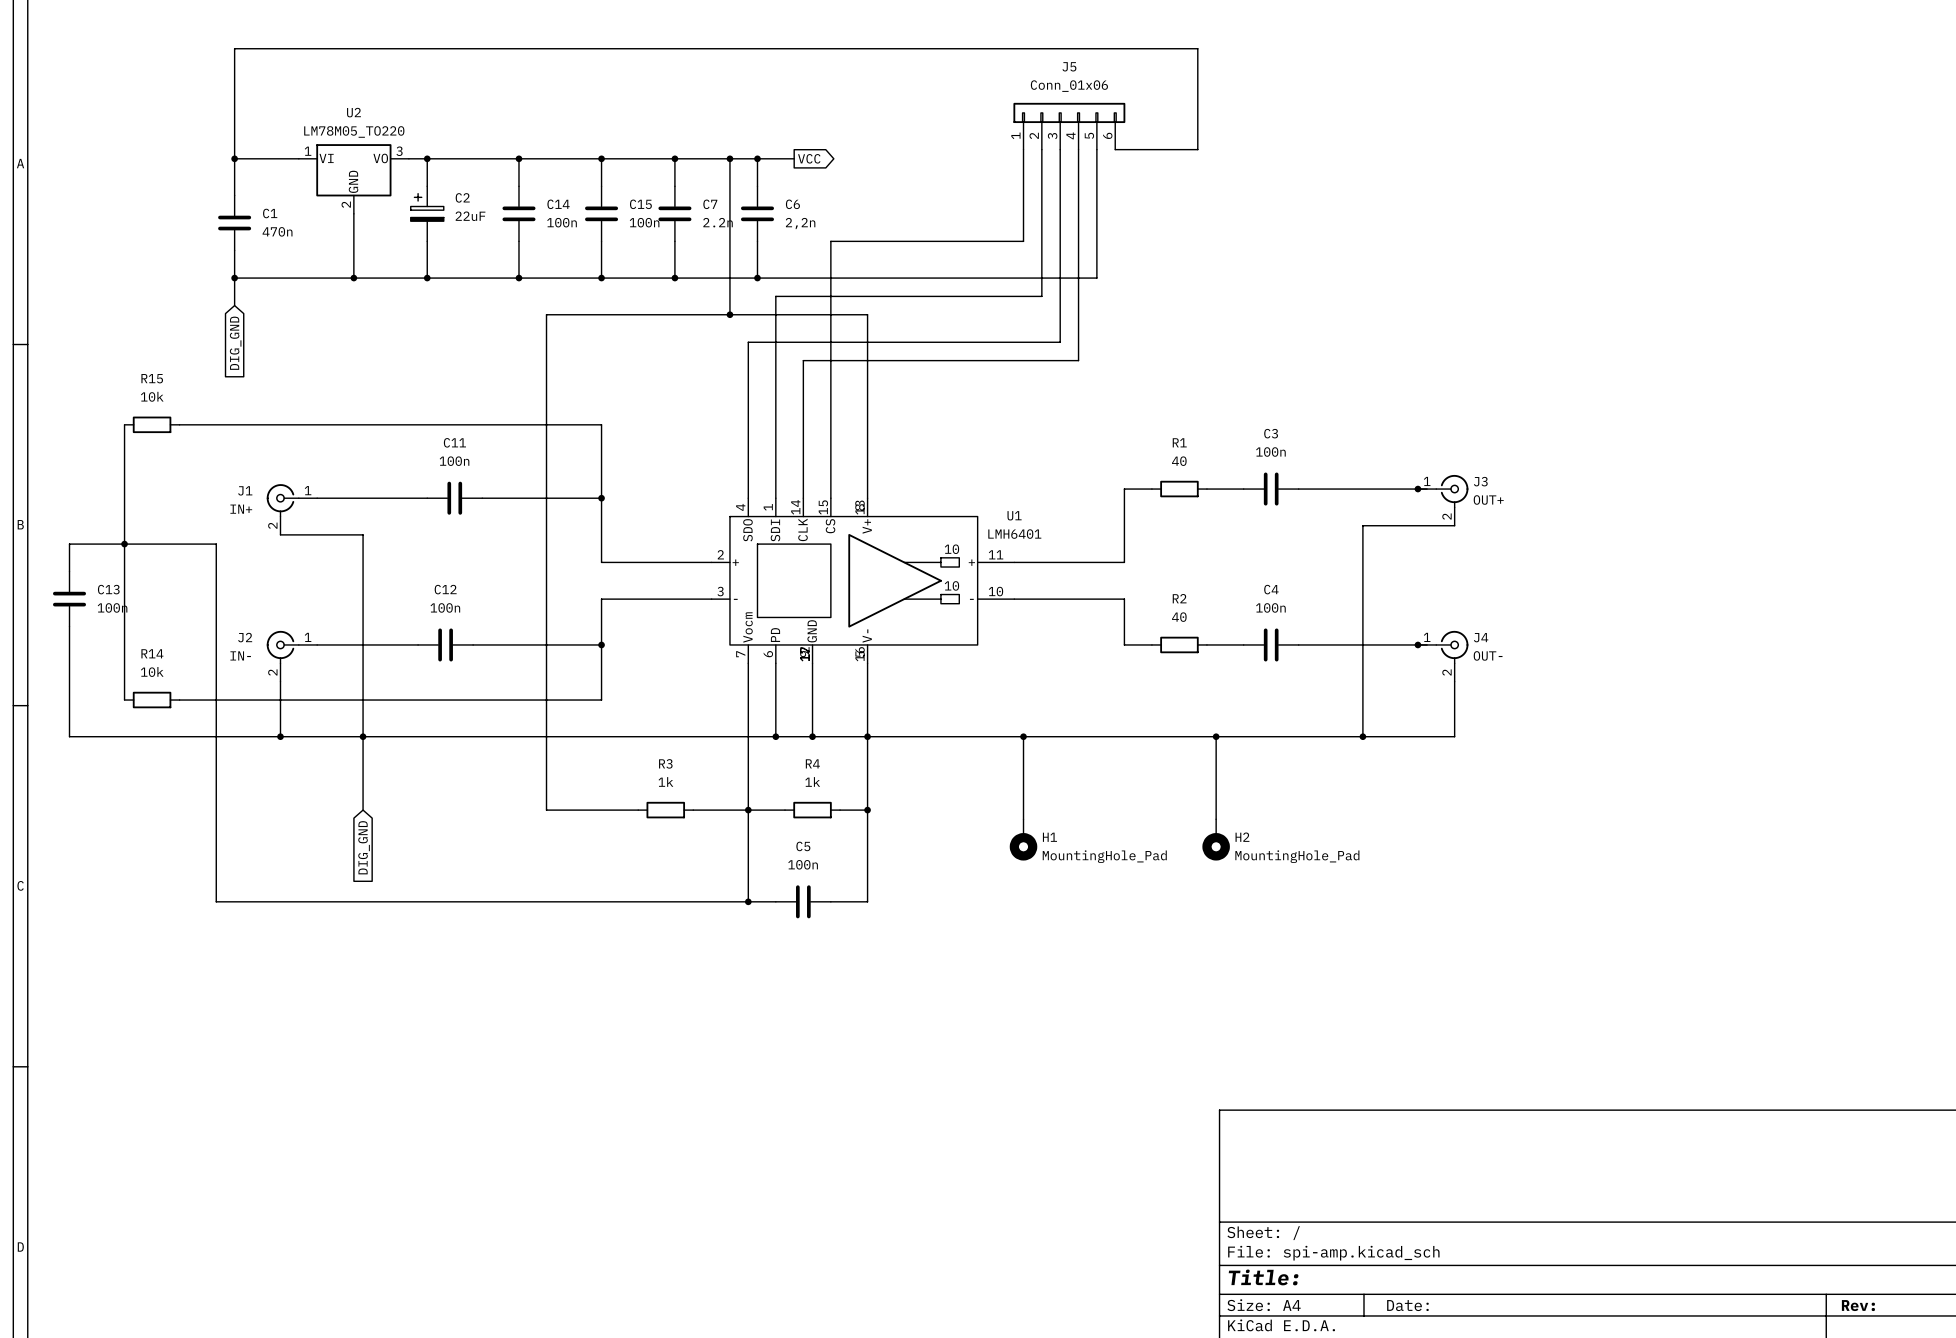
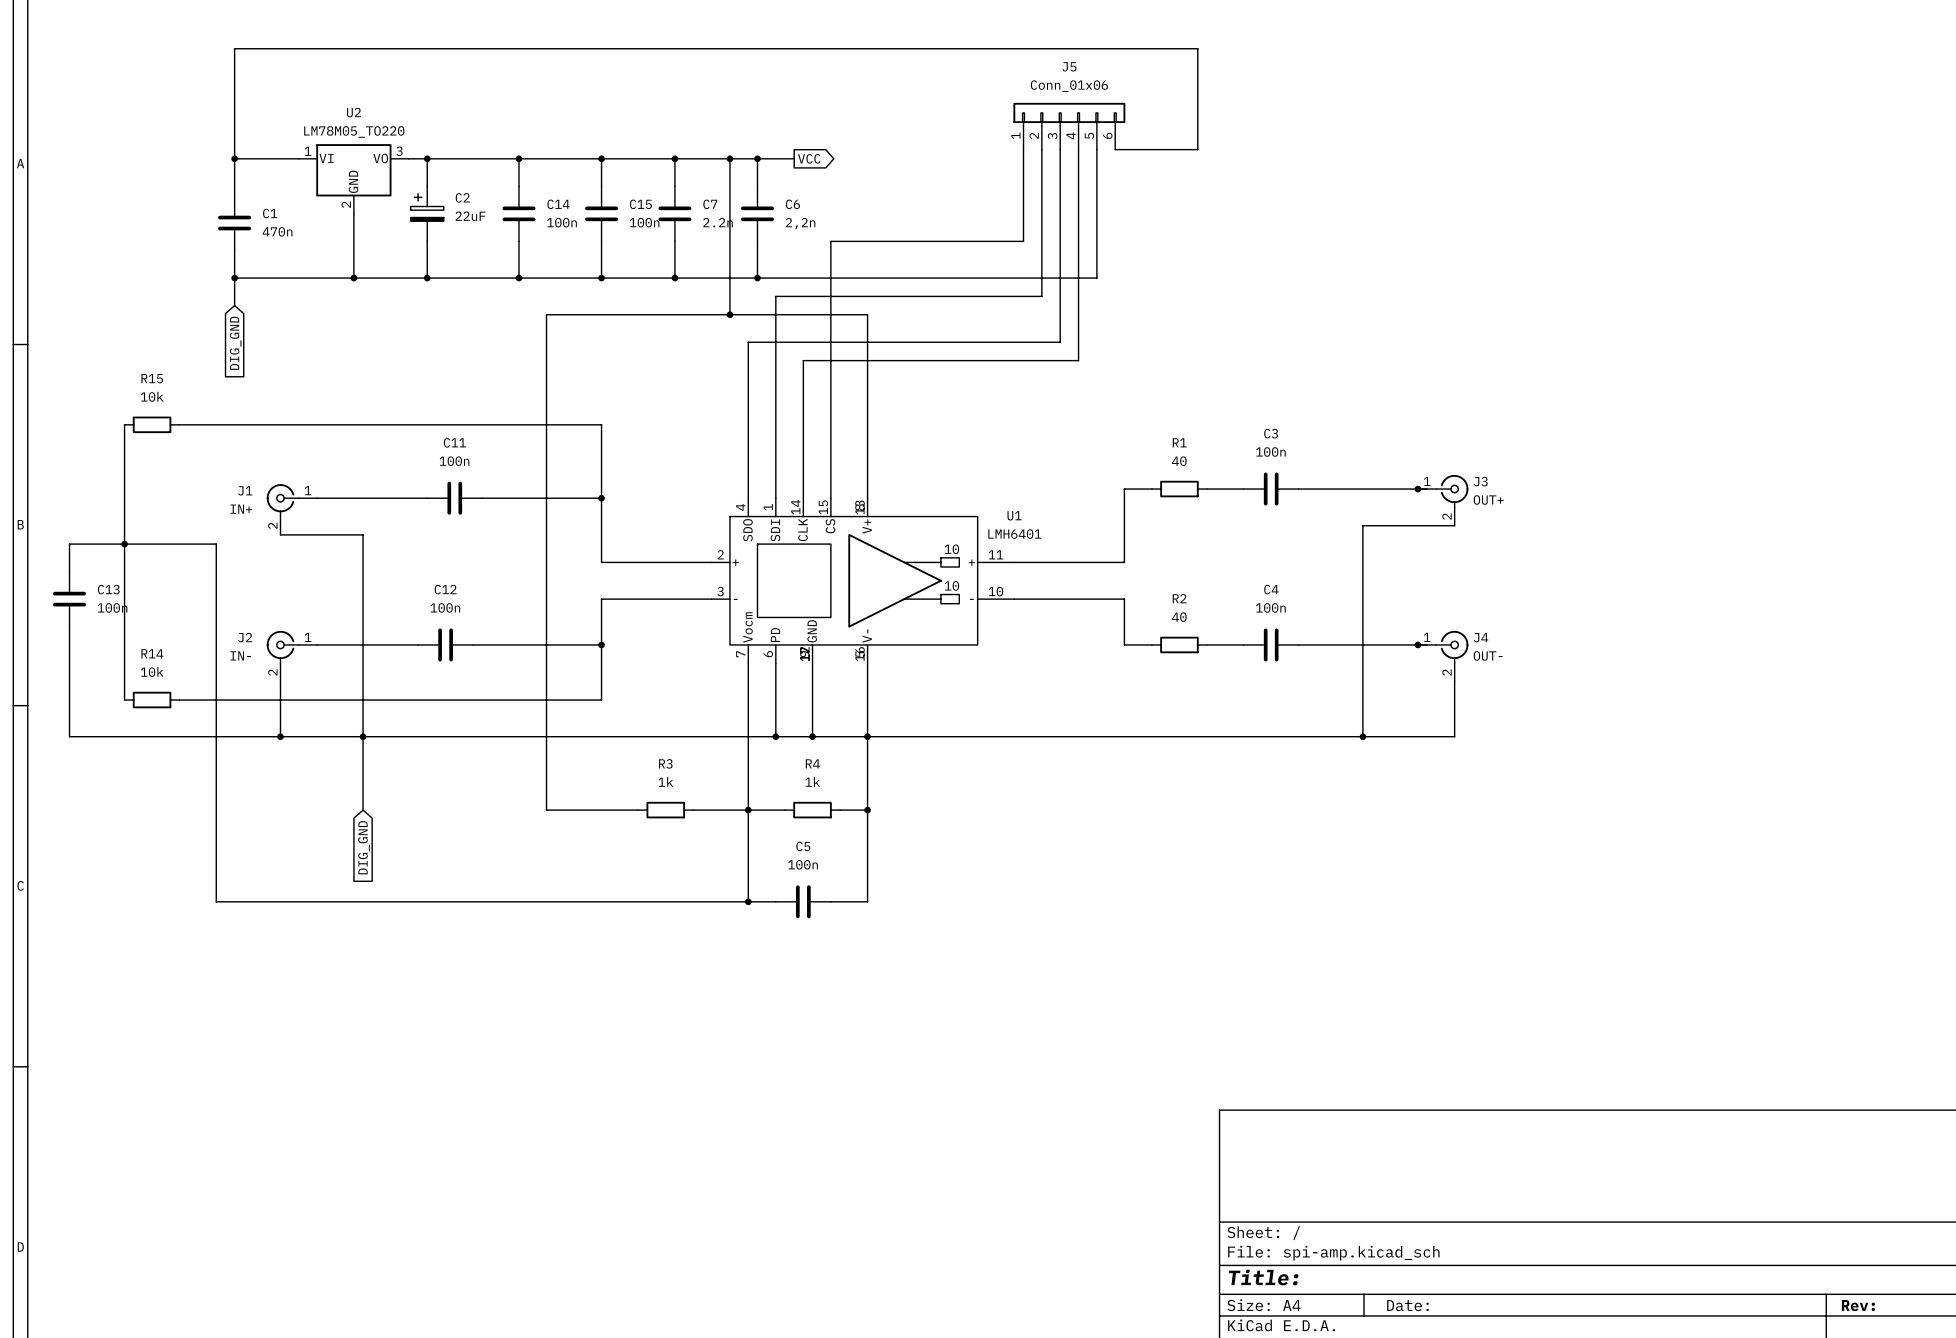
wire: (1023, 736) (1023, 819) -> none
junction: (1023, 736) -> none
wire: (1216, 736) (1216, 819) -> none
junction: (1216, 736) -> none
H1: MountingHole_Pad (1023, 839) -> none
H2: MountingHole_Pad (1216, 839) -> none

